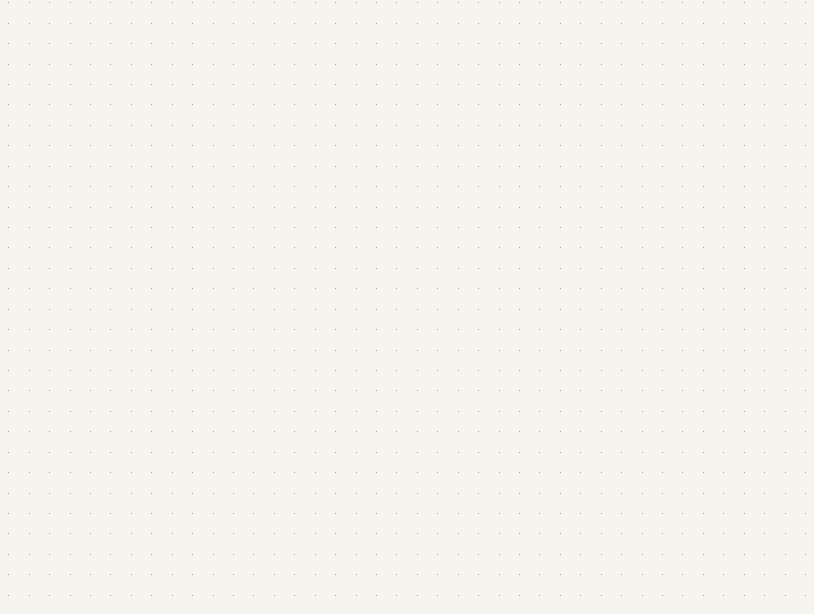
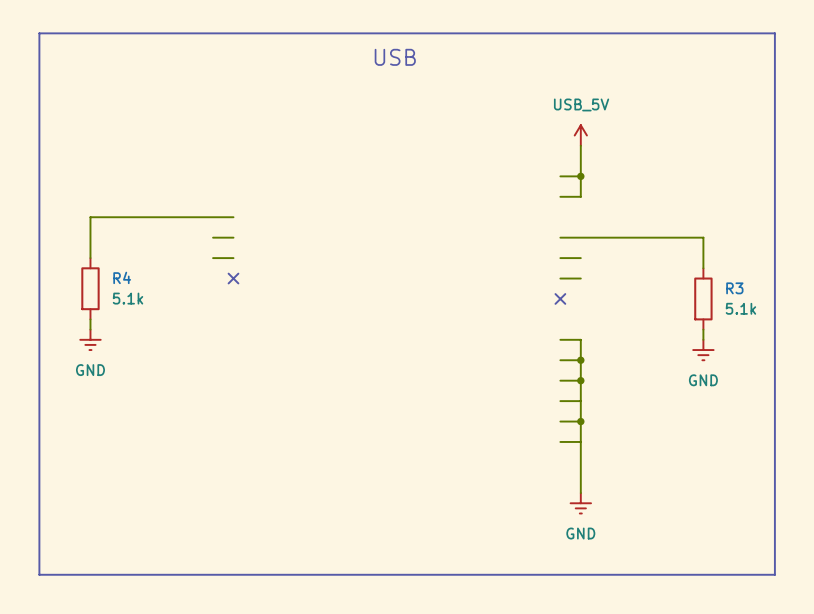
line: none -> (39, 33) (774, 33) (774, 574) (39, 574) (39, 33)
text: none -> USB (395, 57)
power symbol: none -> USB_5V (580, 135)
wire: none -> (580, 145) (580, 196) (560, 196)
wire: none -> (560, 176) (580, 176)
junction: none -> (580, 176)
wire: none -> (233, 217) (90, 217) (90, 258)
wire: none -> (213, 237) (233, 237)
wire: none -> (560, 237) (703, 237) (703, 268)
wire: none -> (213, 258) (233, 258)
wire: none -> (560, 258) (580, 258)
no-connect mark: none -> (233, 278)
wire: none -> (560, 278) (580, 278)
R4: none -> 5.1k (90, 288)
no-connect mark: none -> (560, 298)
R3: none -> 5.1k (703, 298)
wire: none -> (90, 319) (90, 329)
wire: none -> (703, 329) (703, 339)
power symbol: none -> GND (90, 339)
wire: none -> (560, 339) (580, 339) (580, 493)
power symbol: none -> GND (703, 350)
wire: none -> (560, 360) (580, 360)
junction: none -> (580, 360)
wire: none -> (560, 380) (580, 380)
junction: none -> (580, 380)
wire: none -> (560, 401) (580, 401)
wire: none -> (560, 421) (580, 421)
junction: none -> (580, 421)
wire: none -> (560, 441) (580, 441)
power symbol: none -> GND (580, 503)

